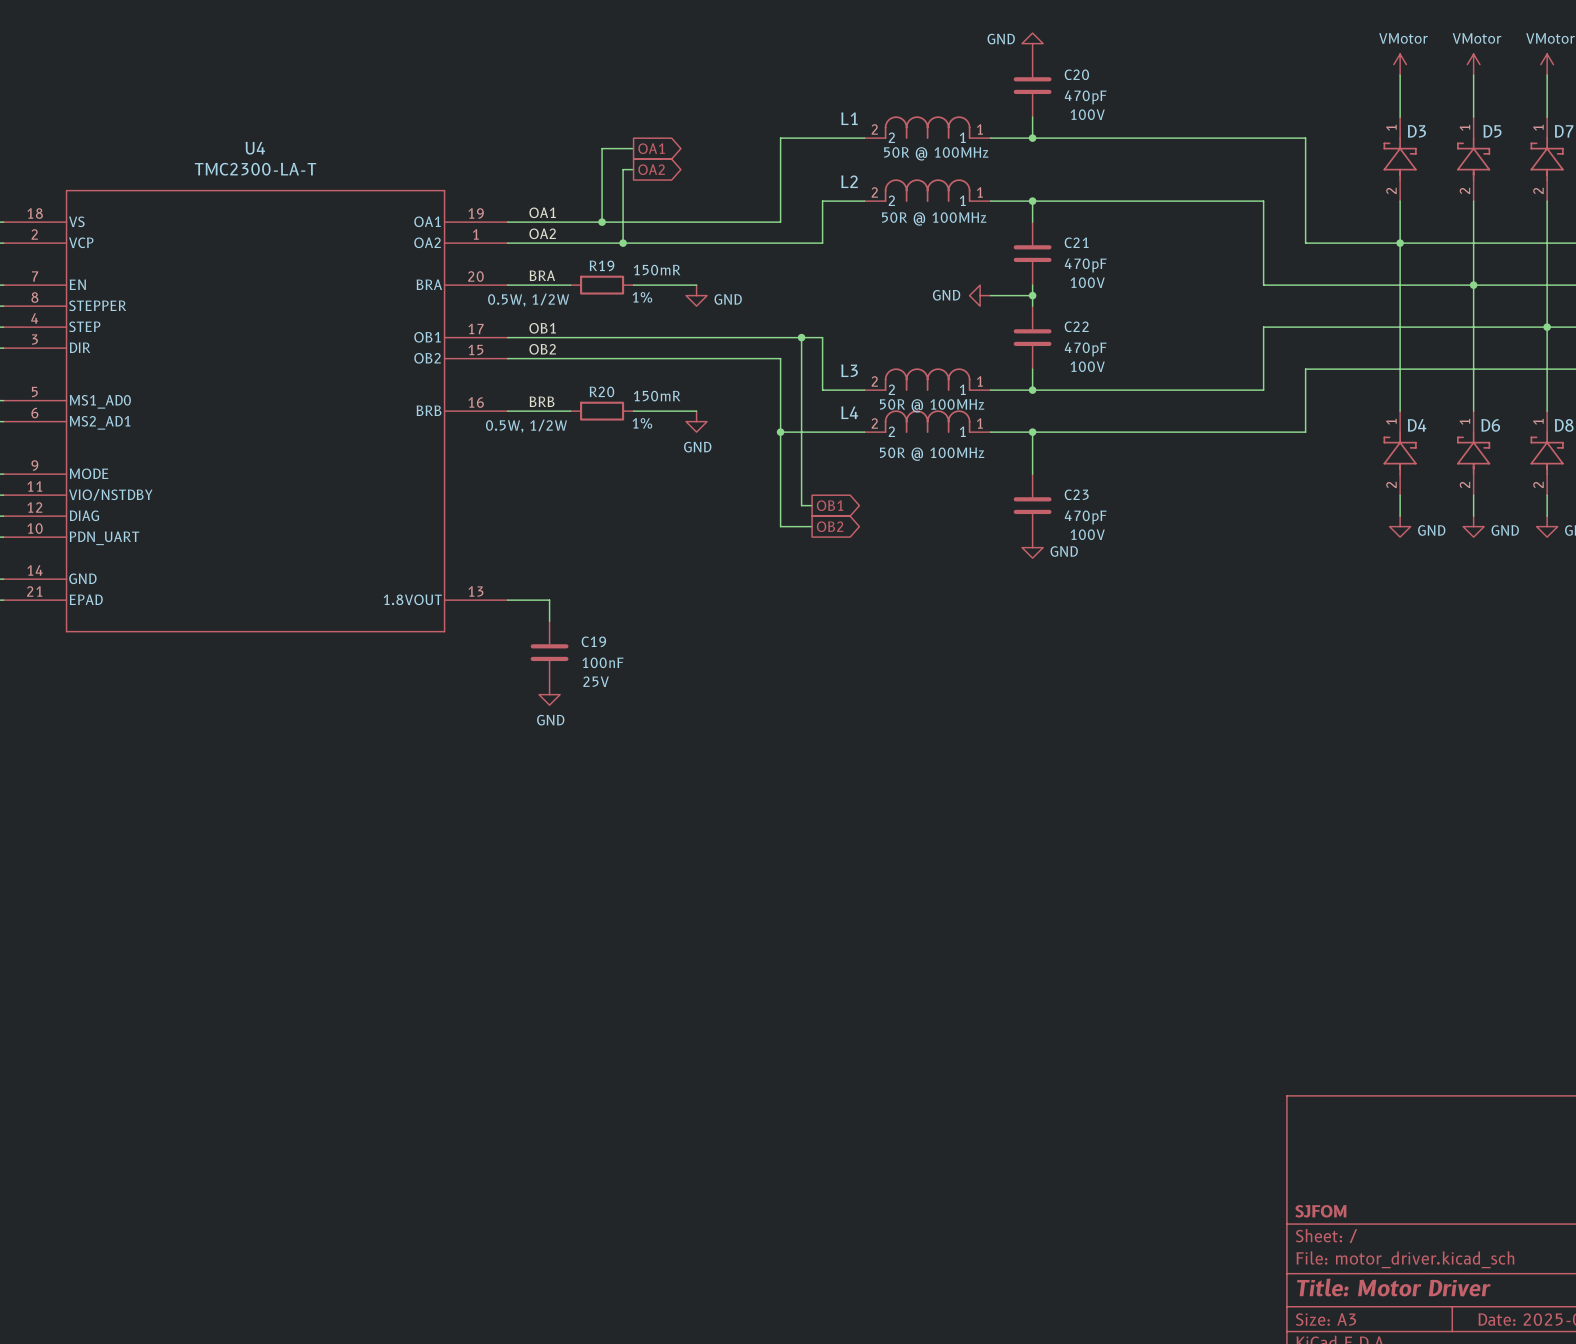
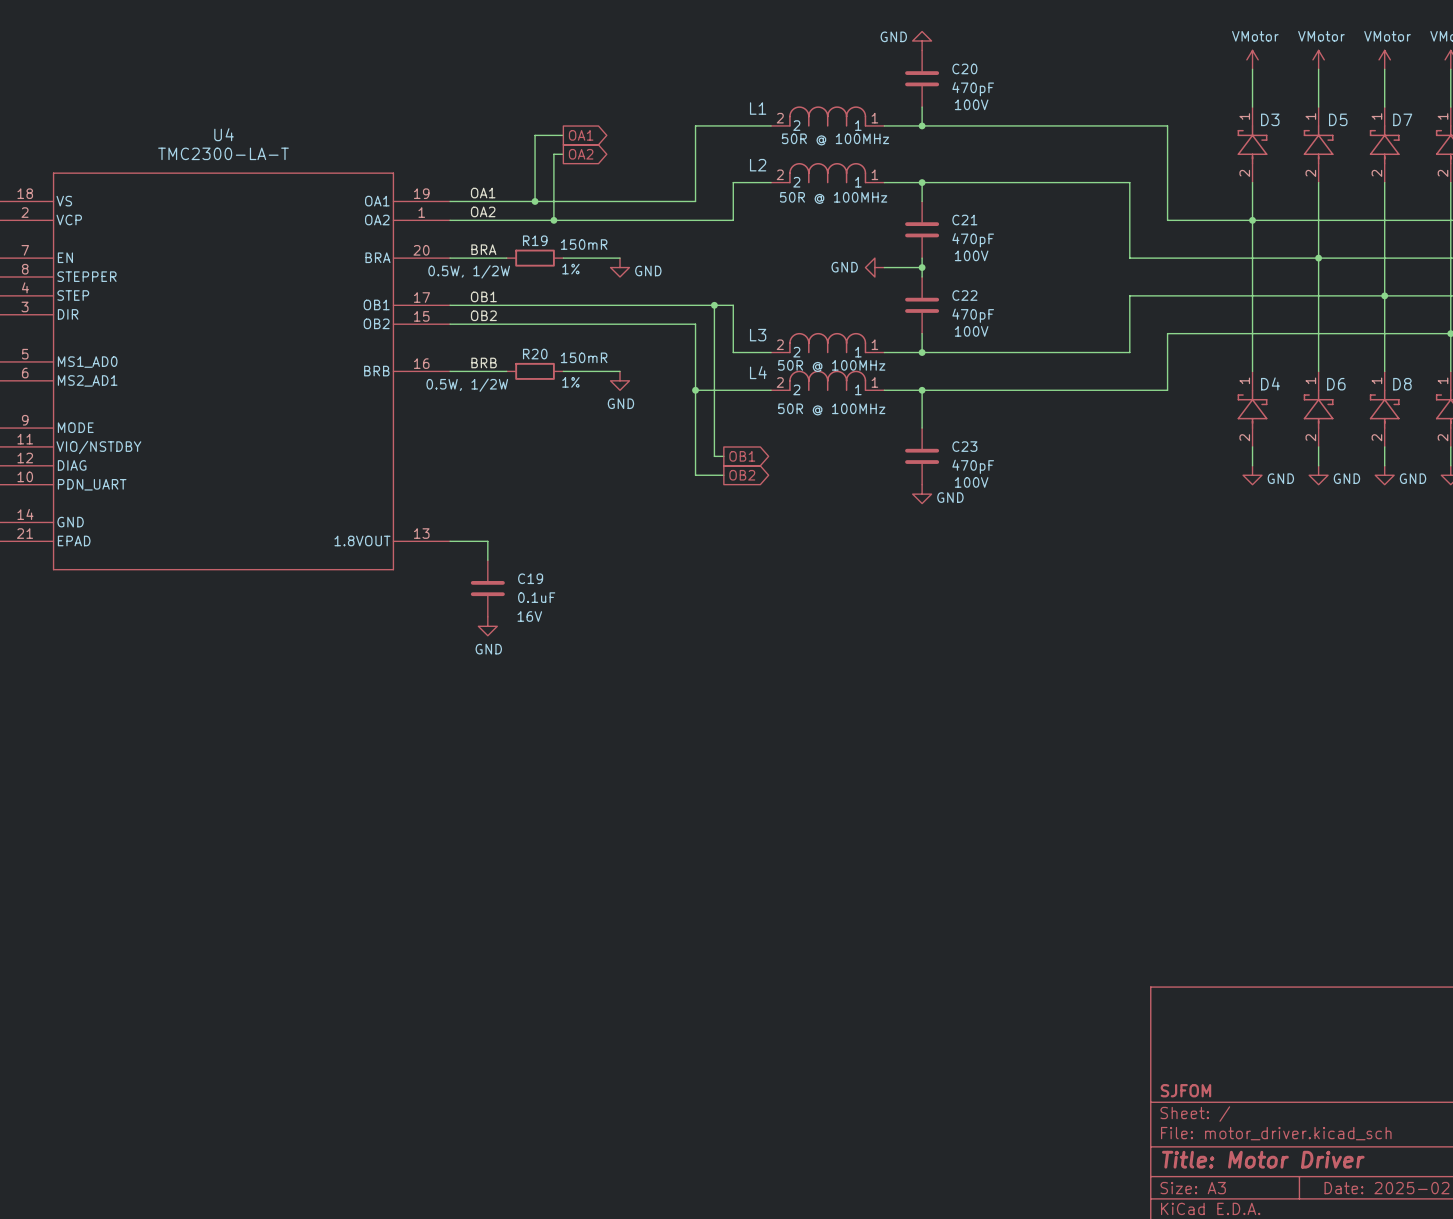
C19 value: 100nF (602, 662) -> 0.1uF (536, 597)
C19 text: 25V (596, 681) -> 16V (529, 616)

